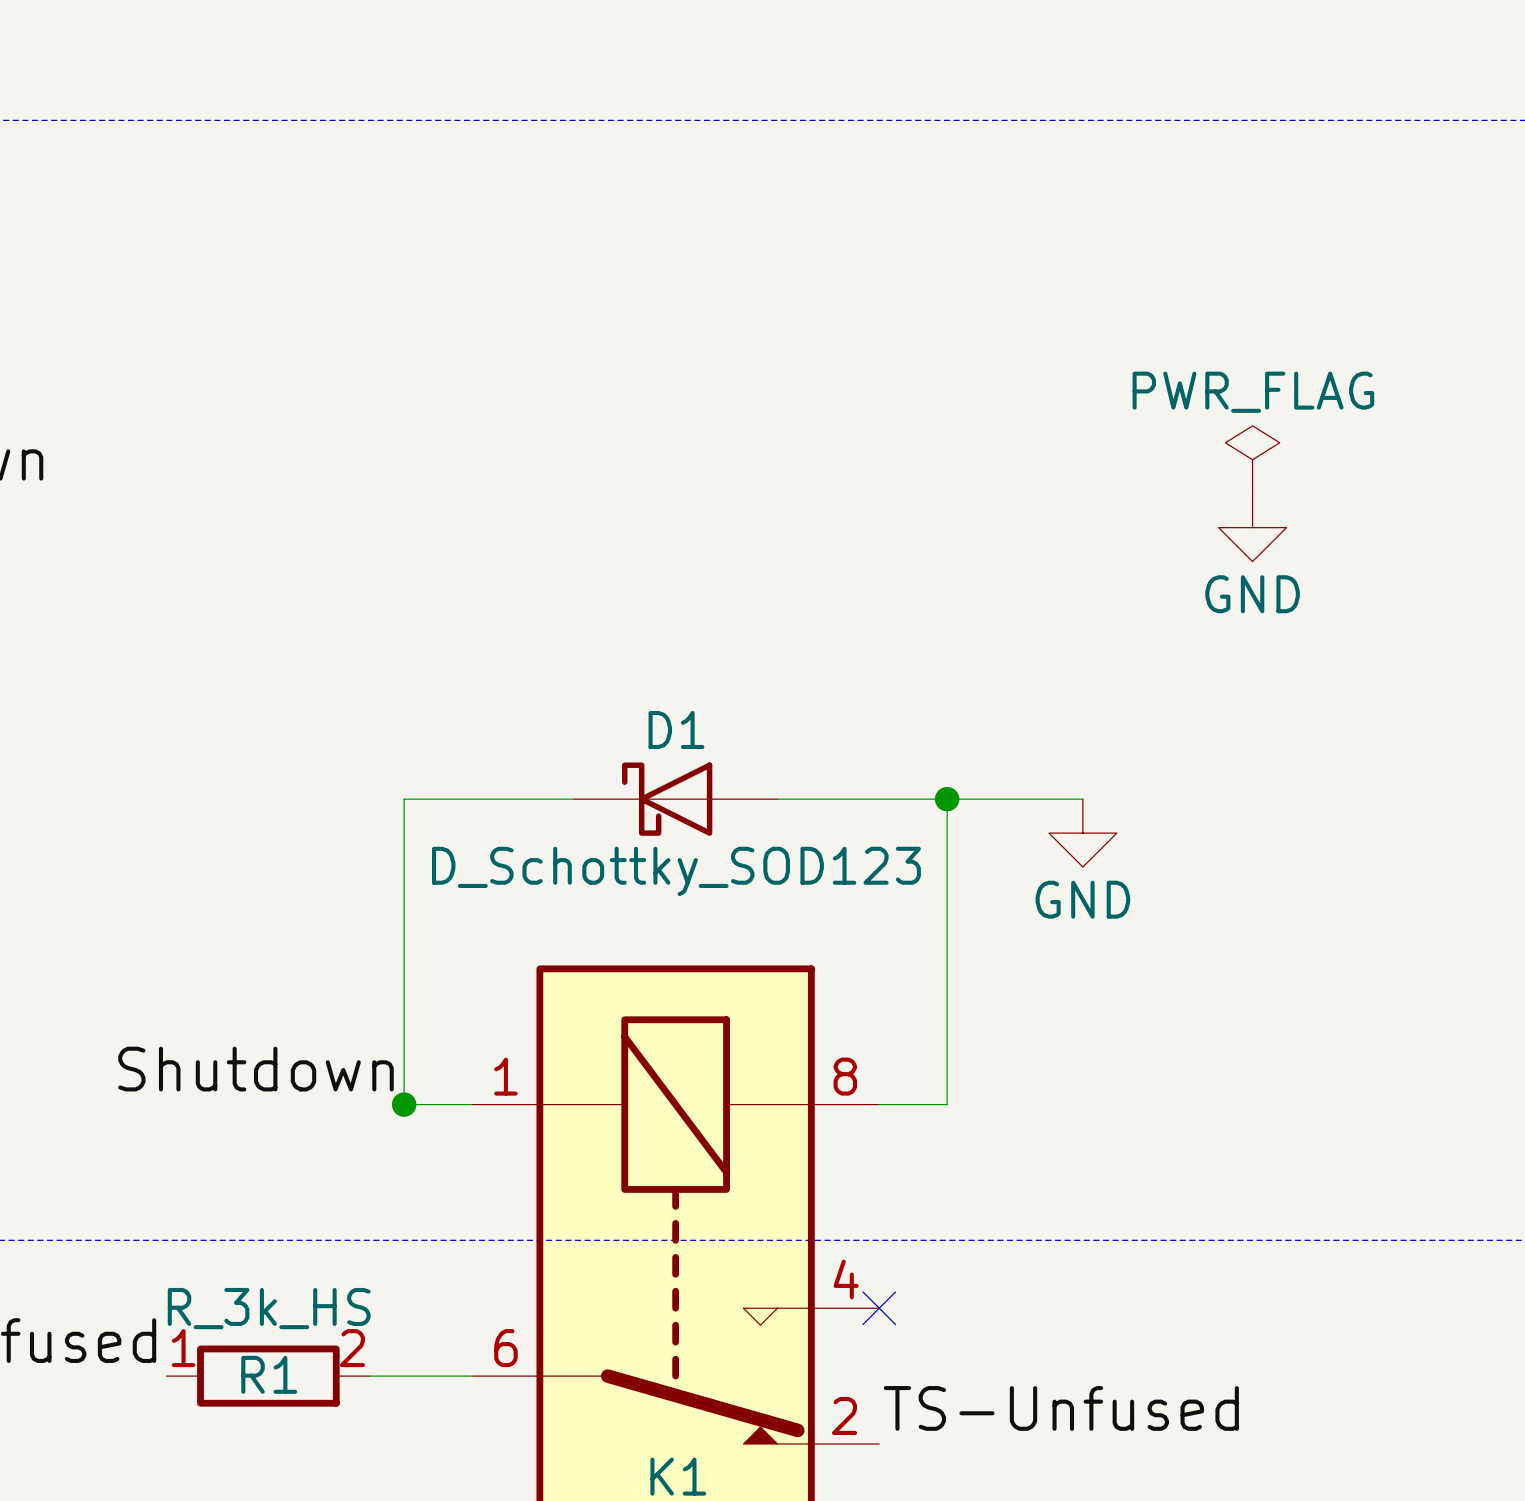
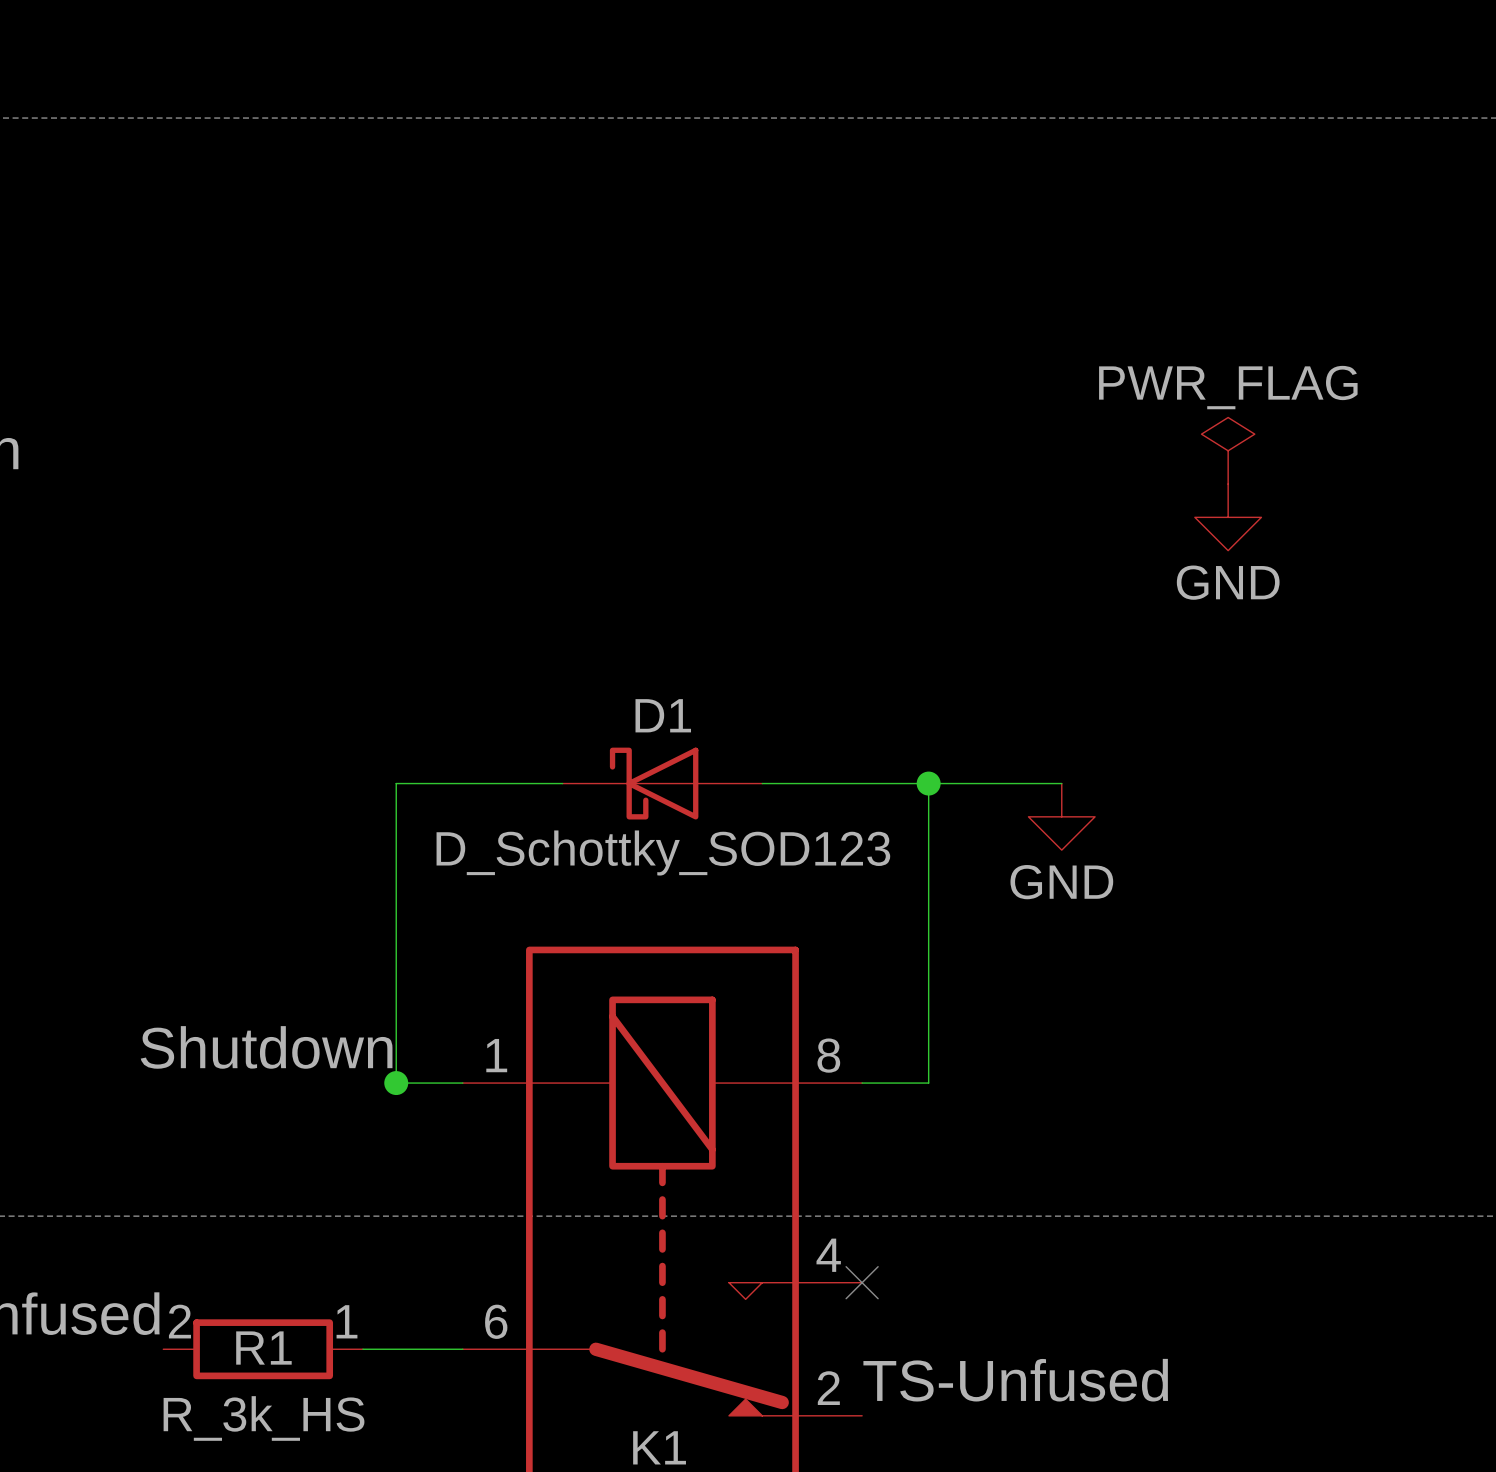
R1 rotation: 0° (268, 1376) -> 180° (263, 1349)

